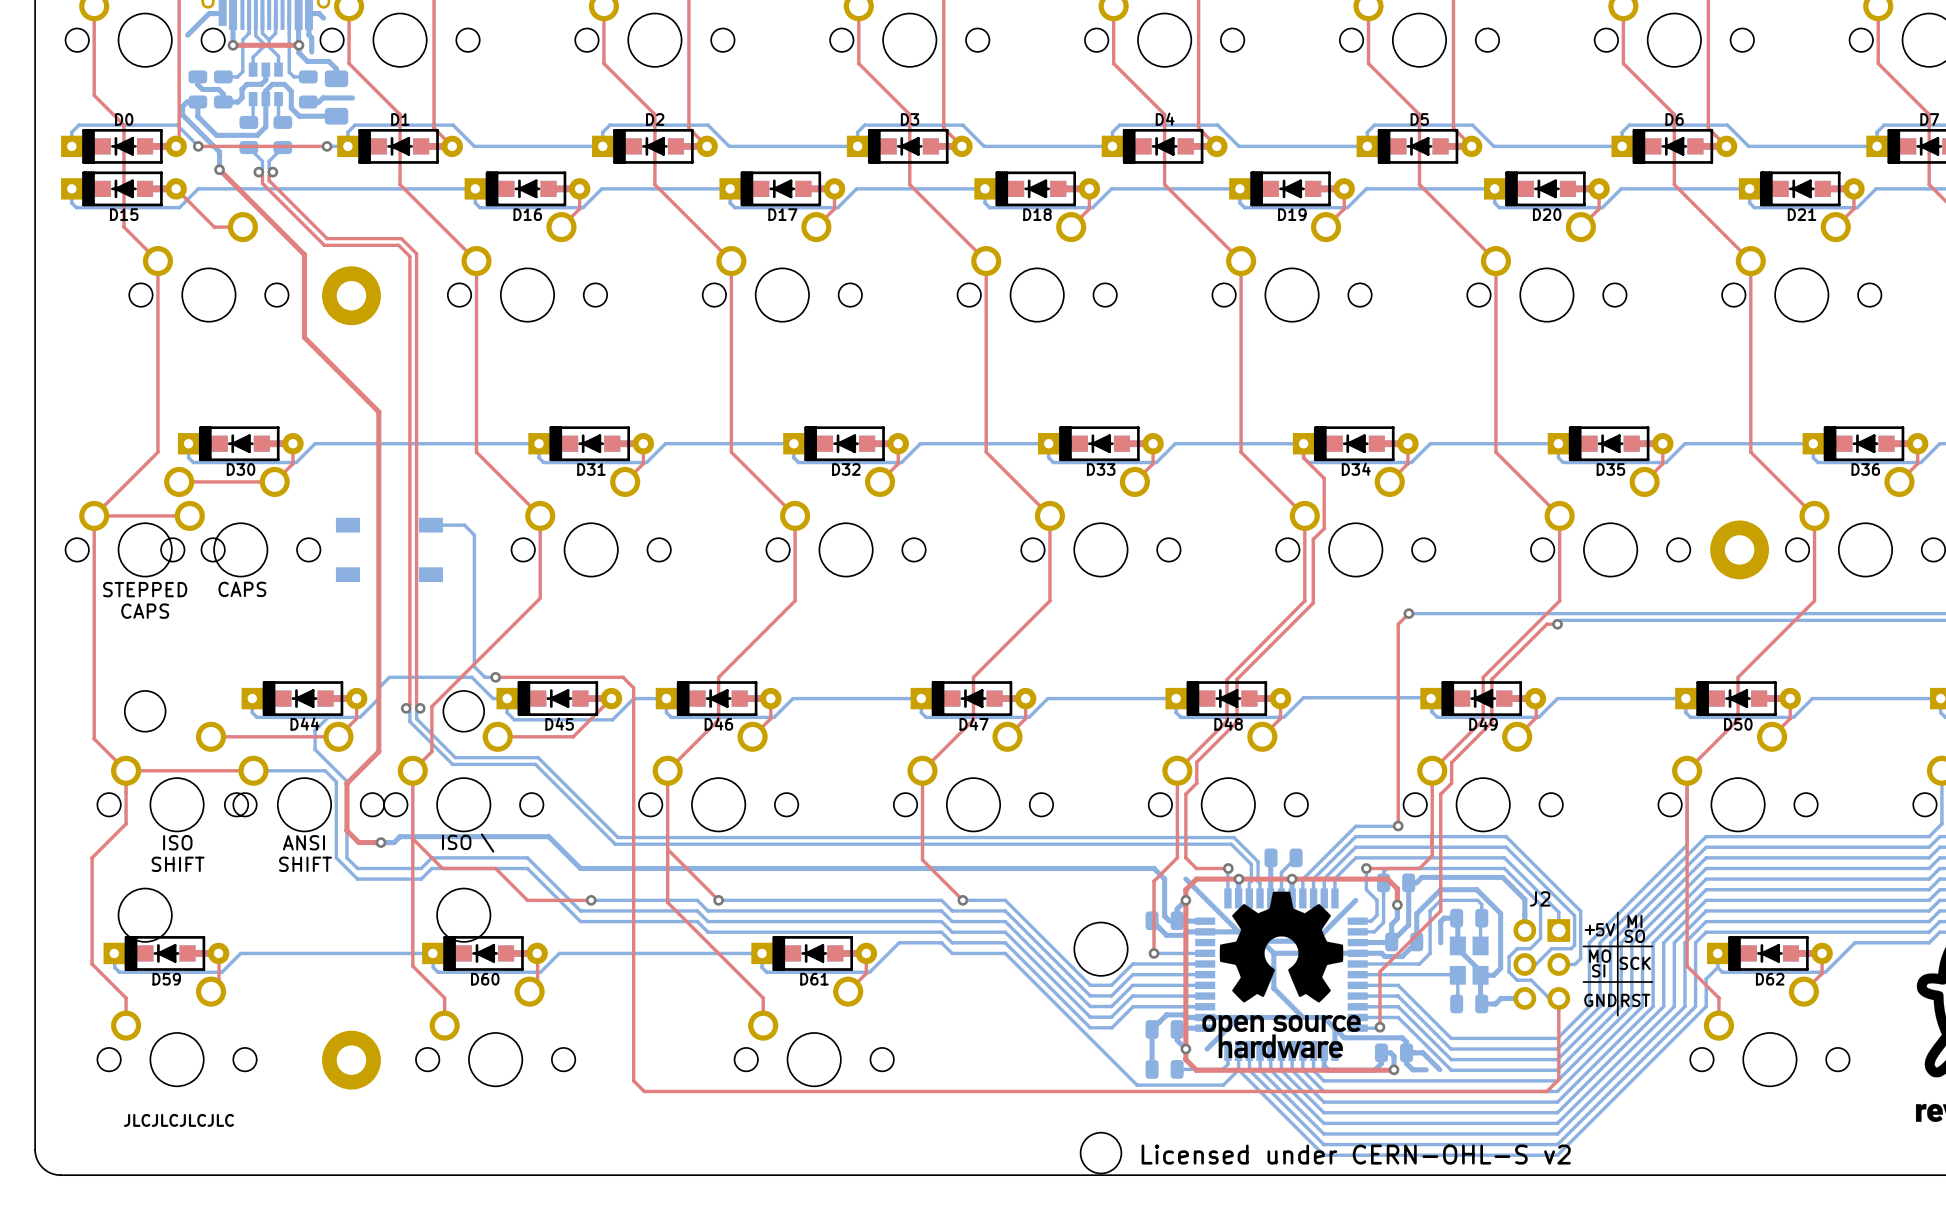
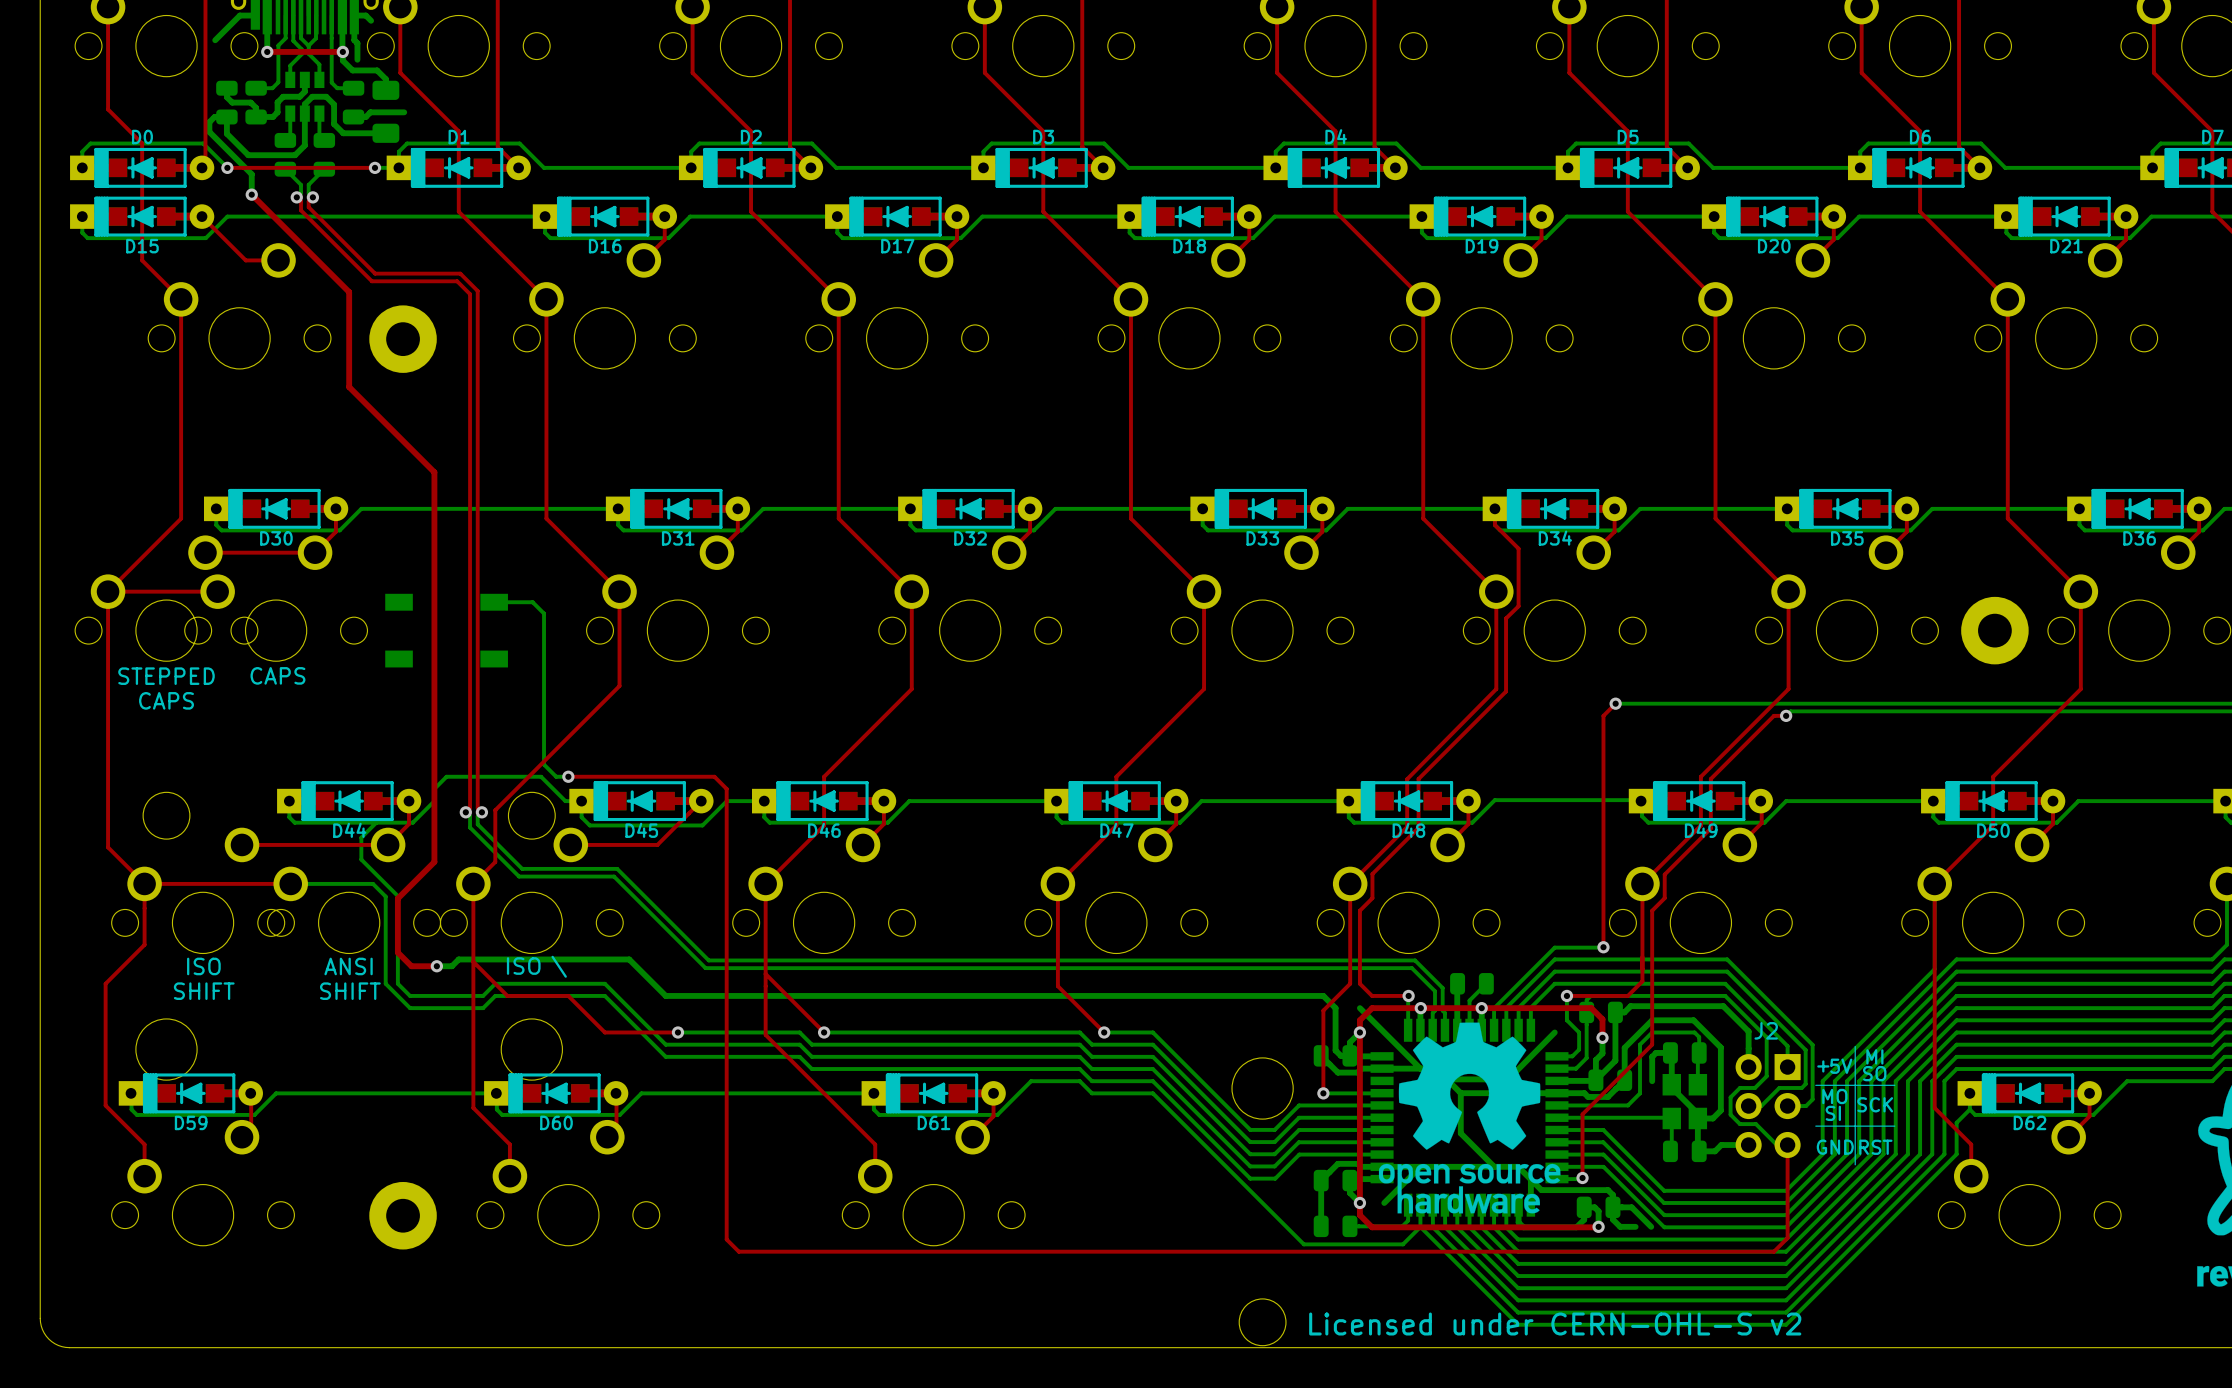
text: JLCJLCJLCJLC (178, 1120) -> none

